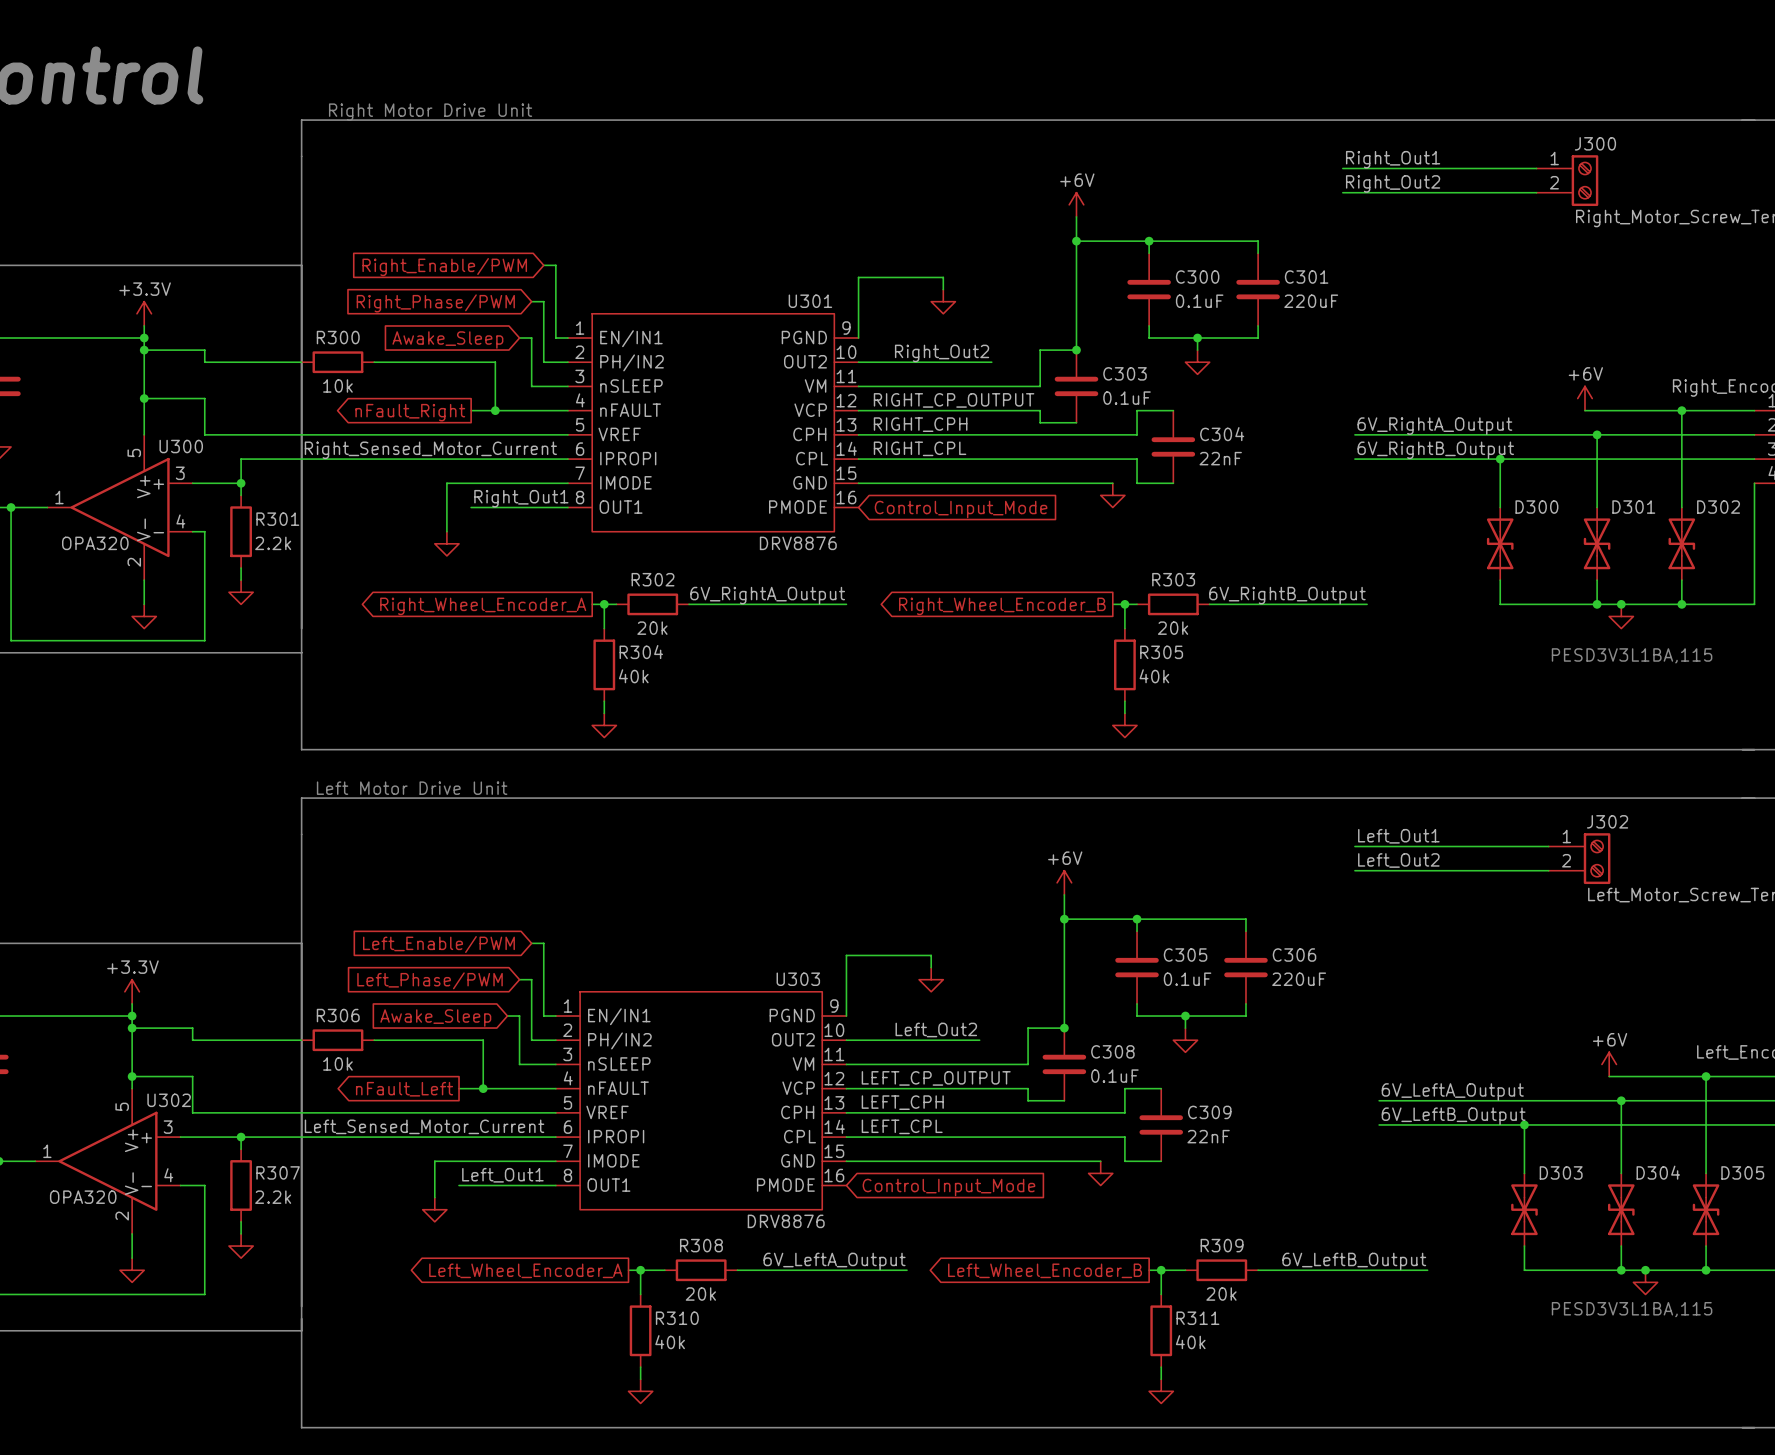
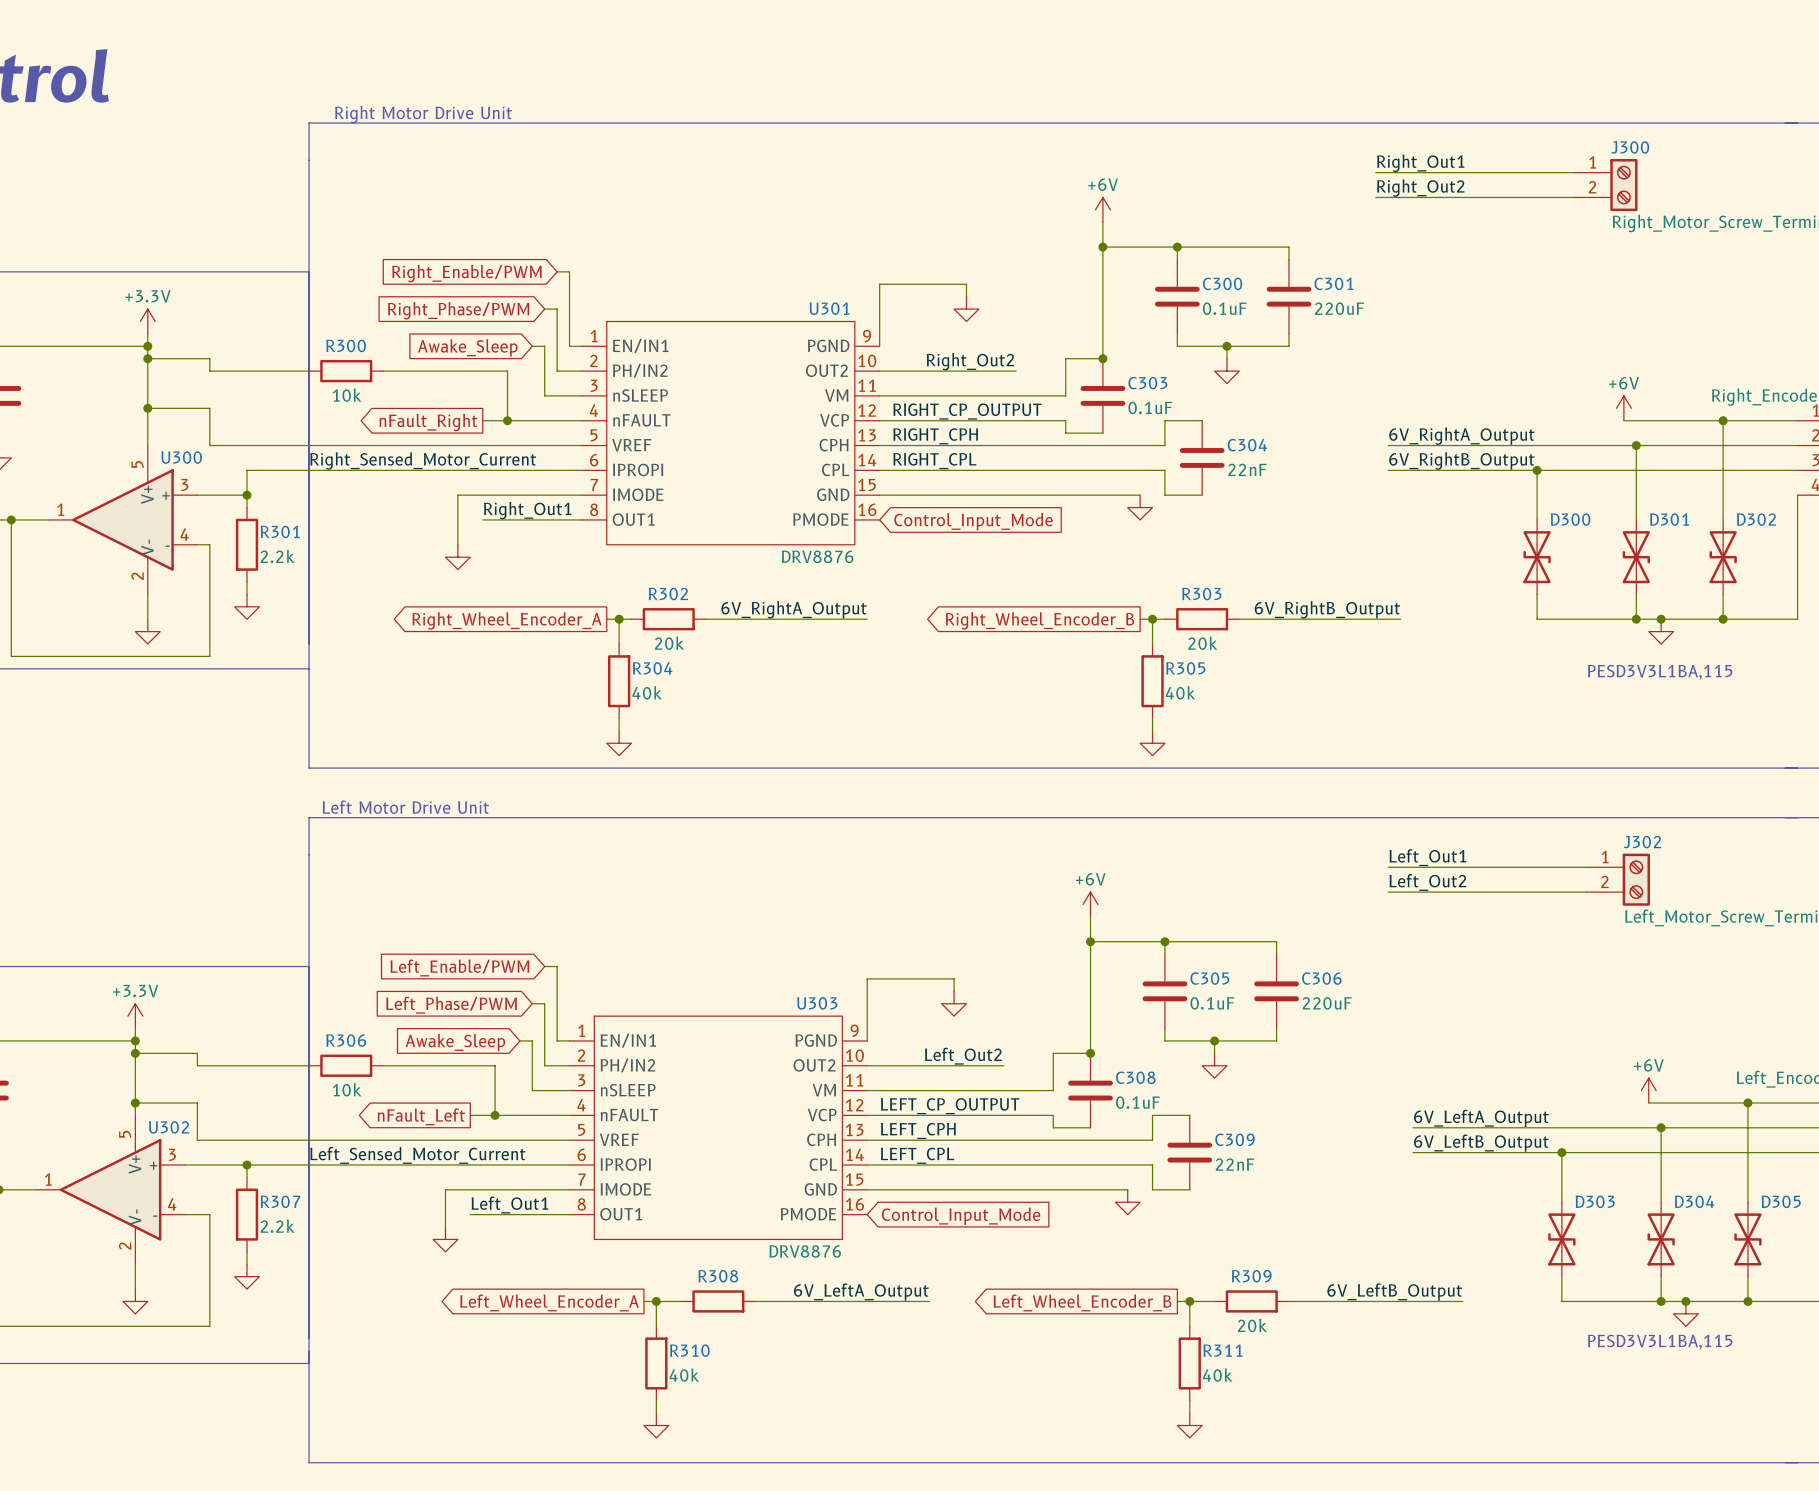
U300 value: OPA320 (95, 543) -> none
U302 value: OPA320 (83, 1197) -> none
R308 value: 20k (700, 1294) -> none

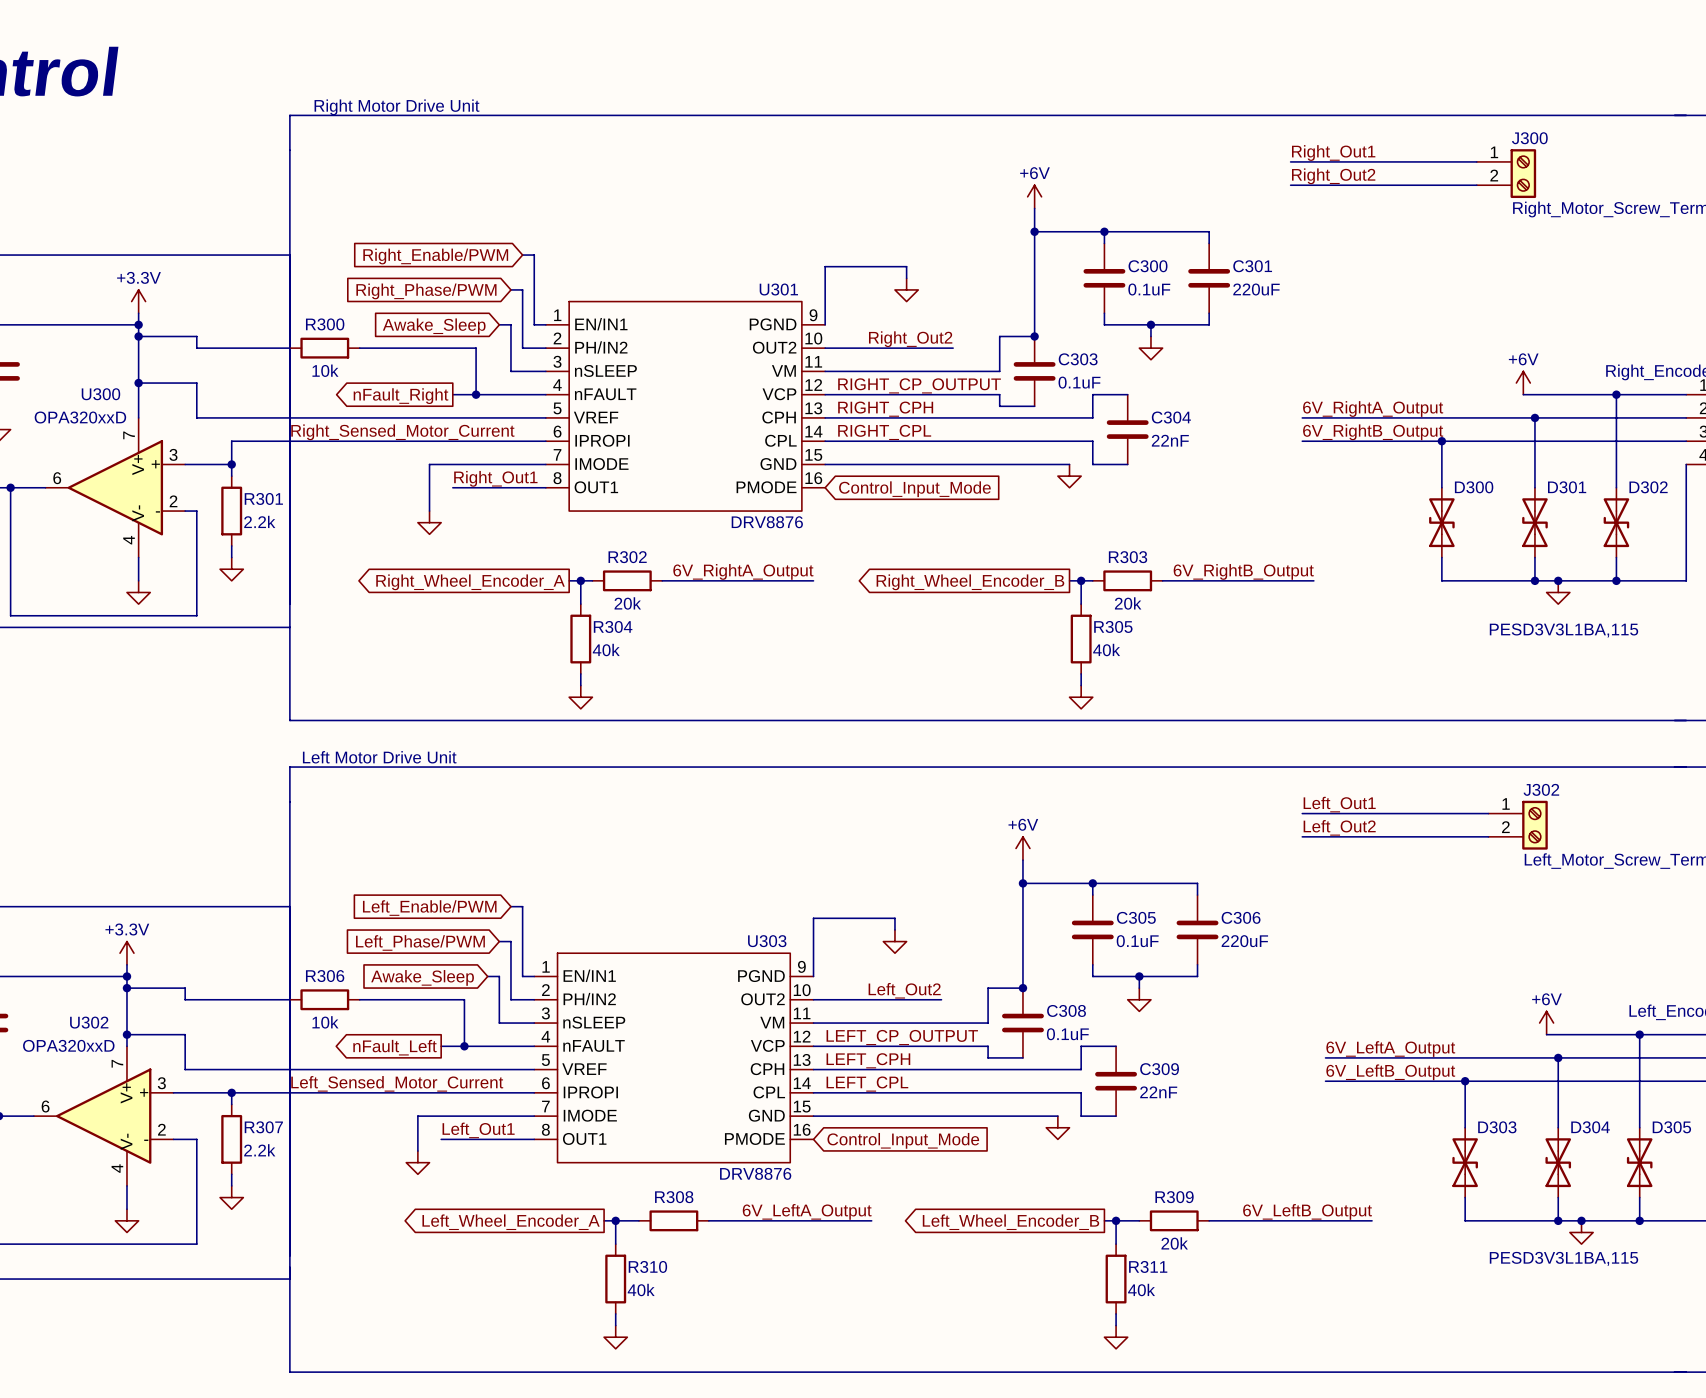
U300 value: none -> OPA320xxD (80, 417)
U300 name position: U300 (181, 457) -> U300 (100, 394)
U300 pin number: 5 (137, 464) -> 7 (129, 435)
U300 pin number: 1 (60, 509) -> 6 (57, 478)
U300 pin number: 4 (184, 534) -> 2 (173, 501)
U300 pin number: 2 (137, 576) -> 4 (129, 540)
U302 value: none -> OPA320xxD (68, 1045)
U302 name position: U302 (169, 1127) -> U302 (89, 1022)
U302 pin number: 5 (125, 1134) -> 7 (117, 1063)
U302 pin number: 1 (48, 1179) -> 6 (45, 1106)
U302 pin number: 4 (172, 1204) -> 2 (161, 1129)
U302 pin number: 2 (125, 1246) -> 4 (117, 1168)

